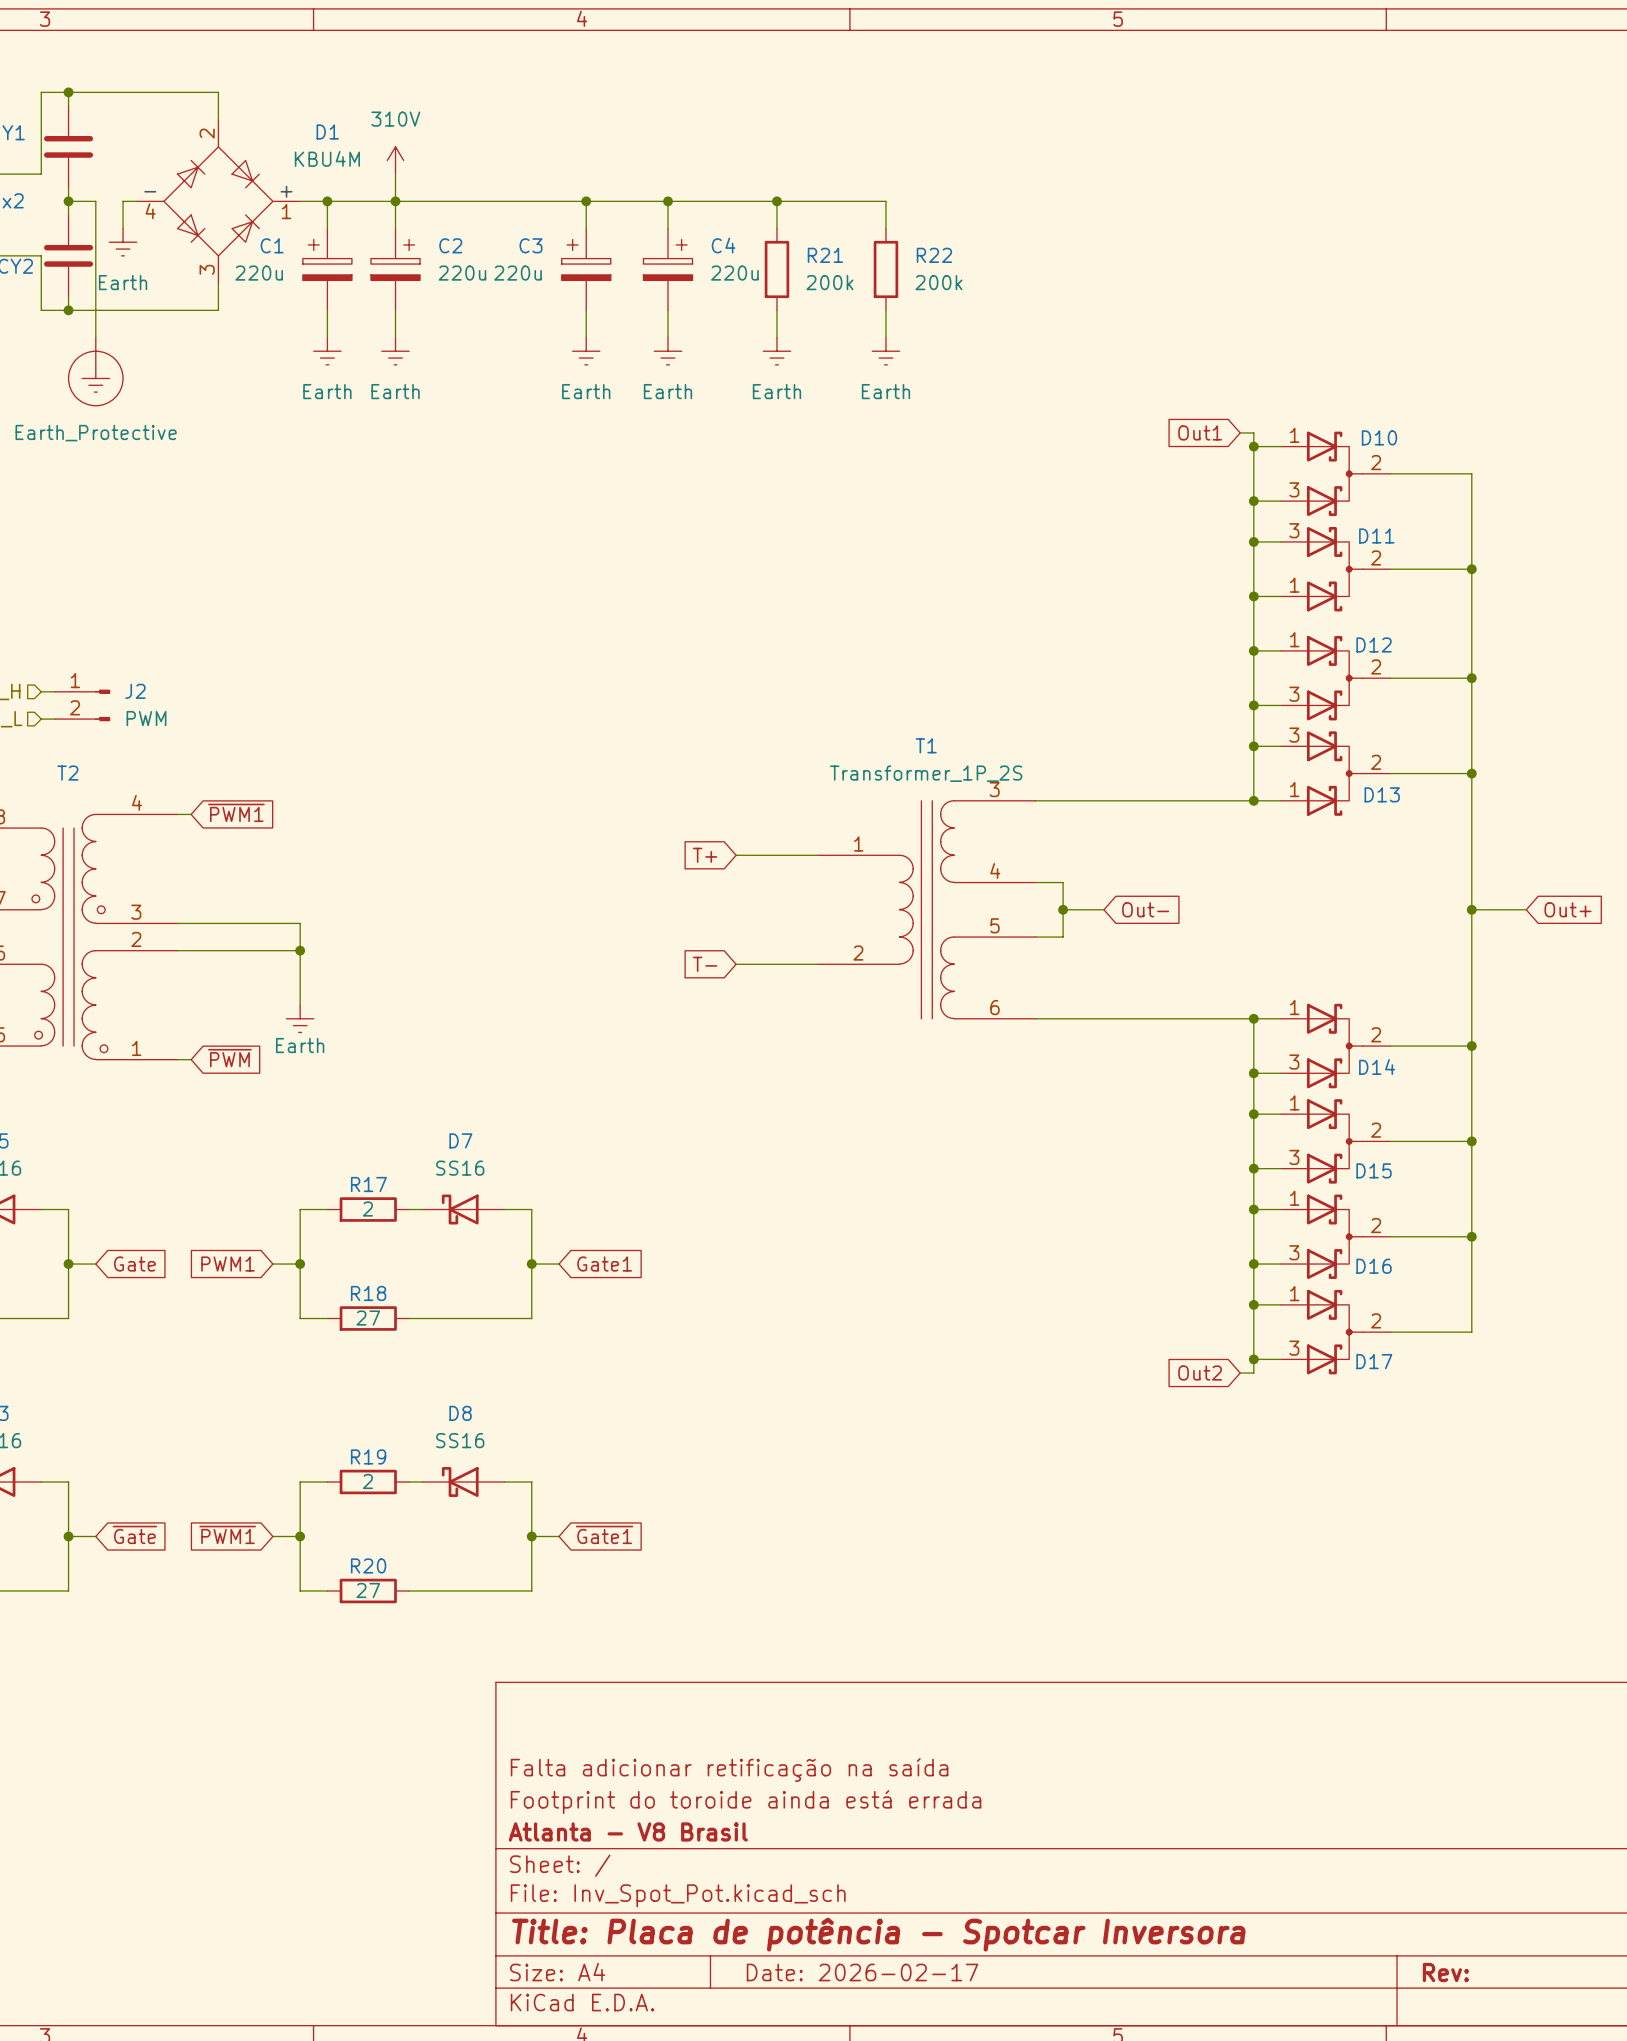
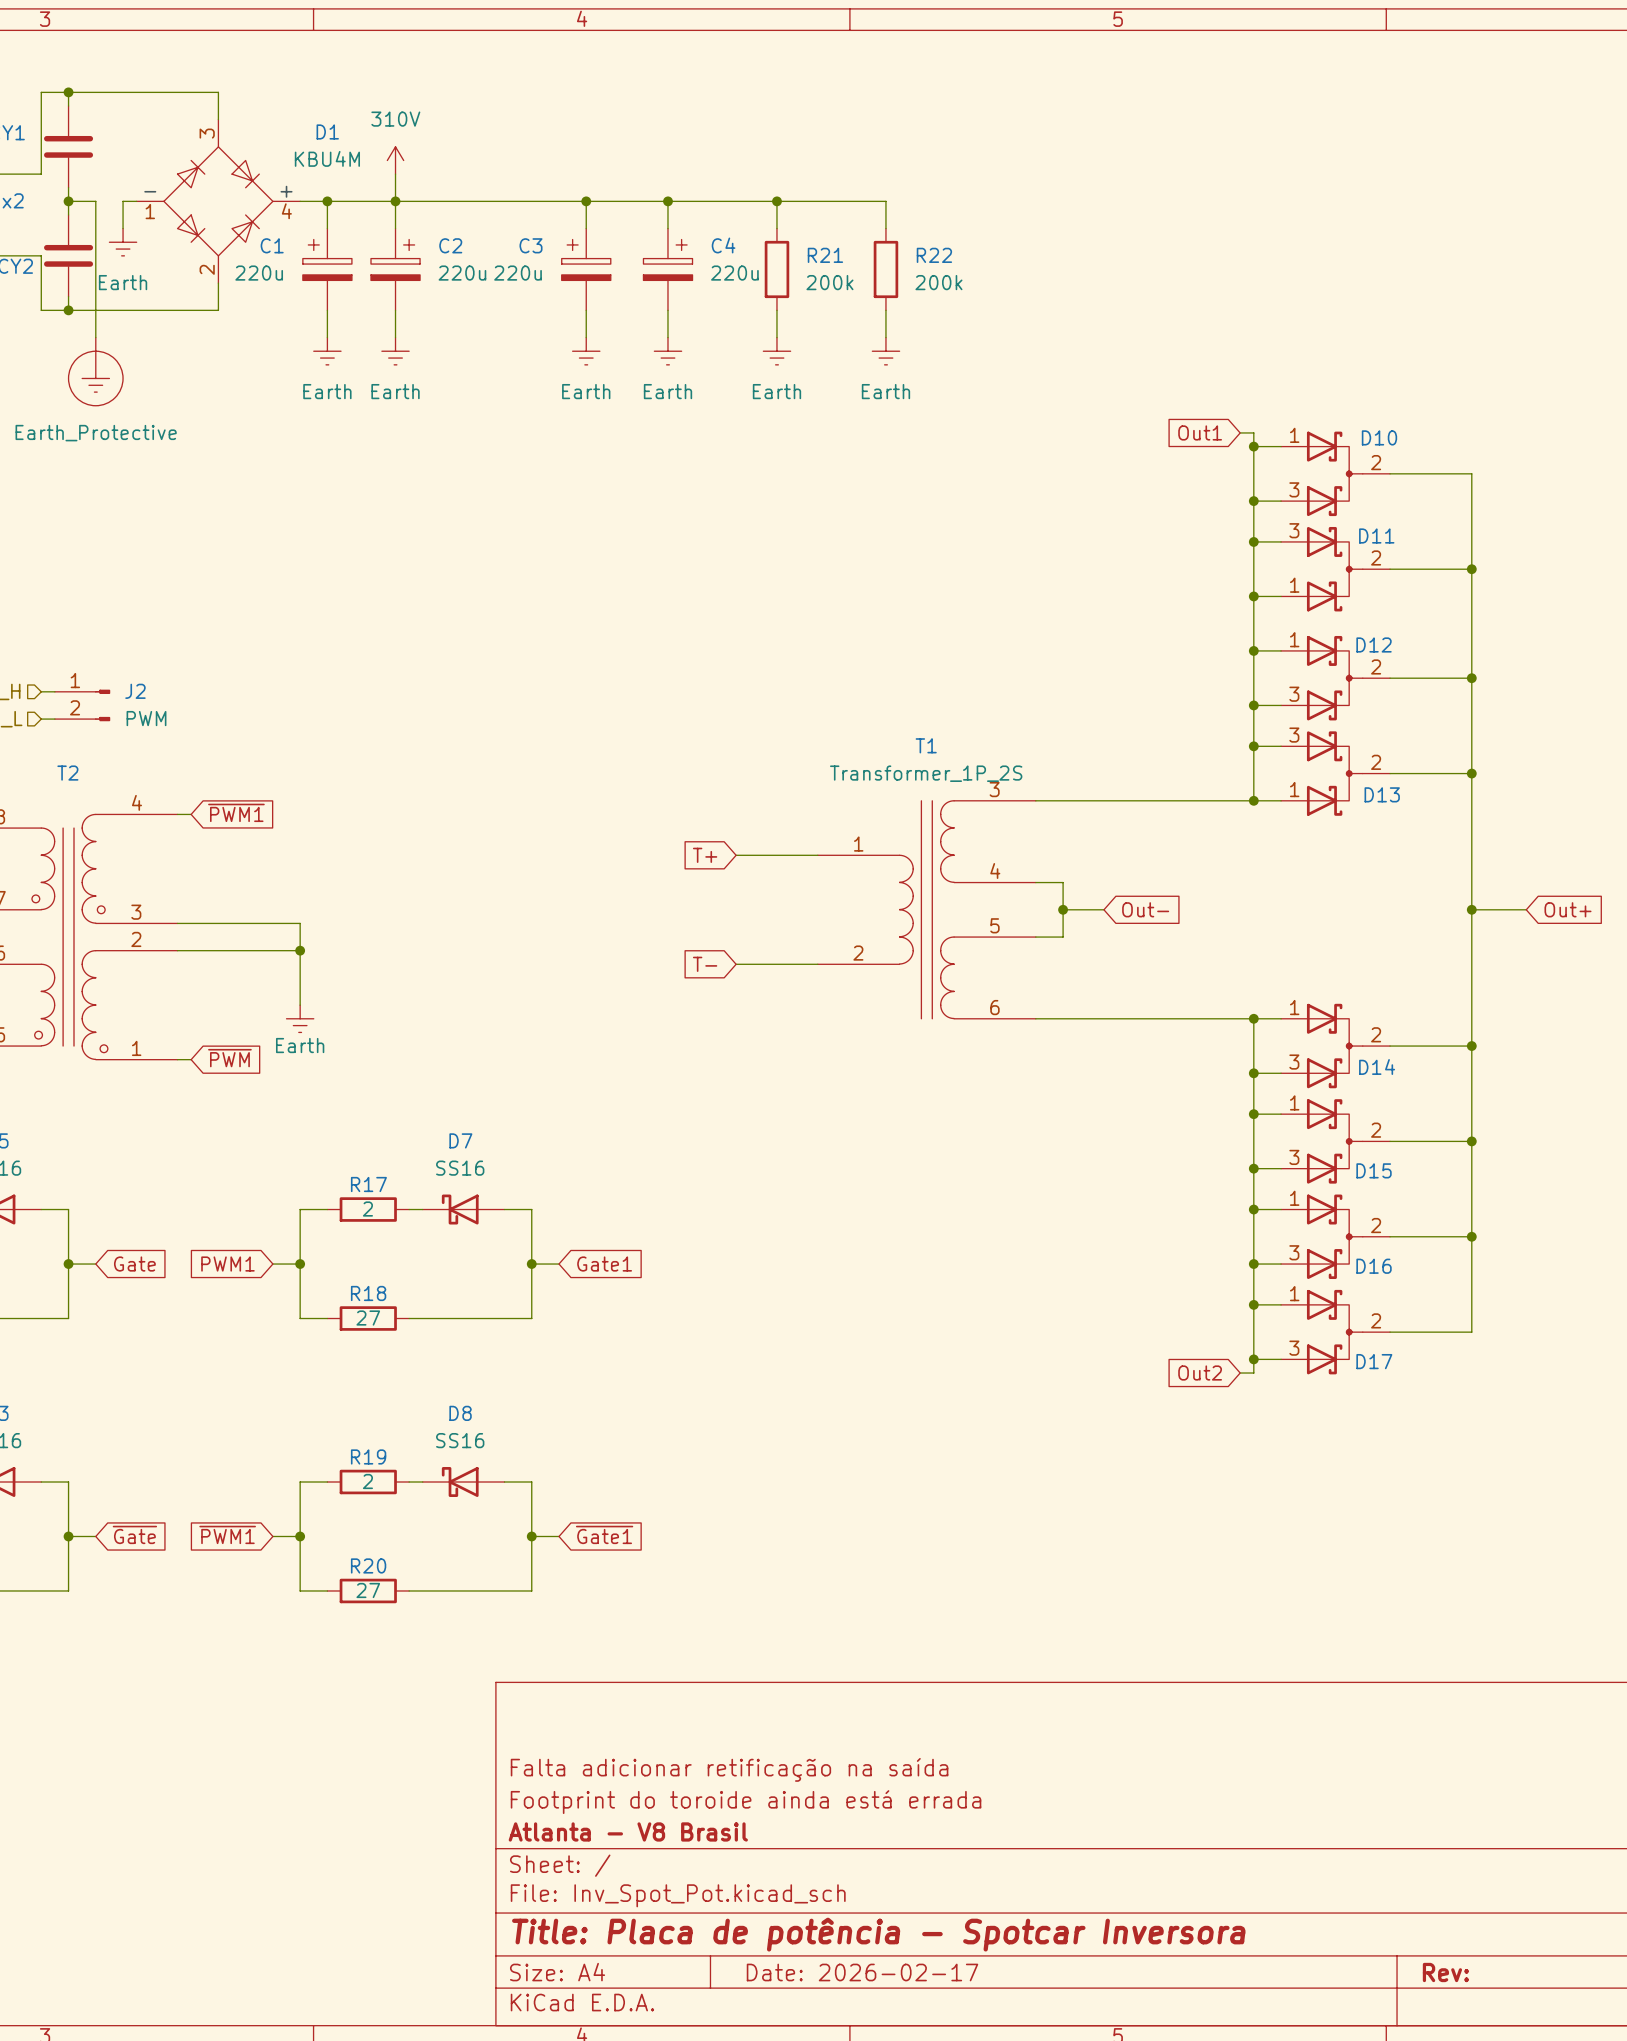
D1 pin number: 2 (207, 133) -> 3 (207, 133)
D1 pin number: 4 (150, 211) -> 1 (150, 211)
D1 pin number: 1 (286, 211) -> 4 (286, 211)
D1 pin number: 3 (207, 269) -> 2 (207, 269)

